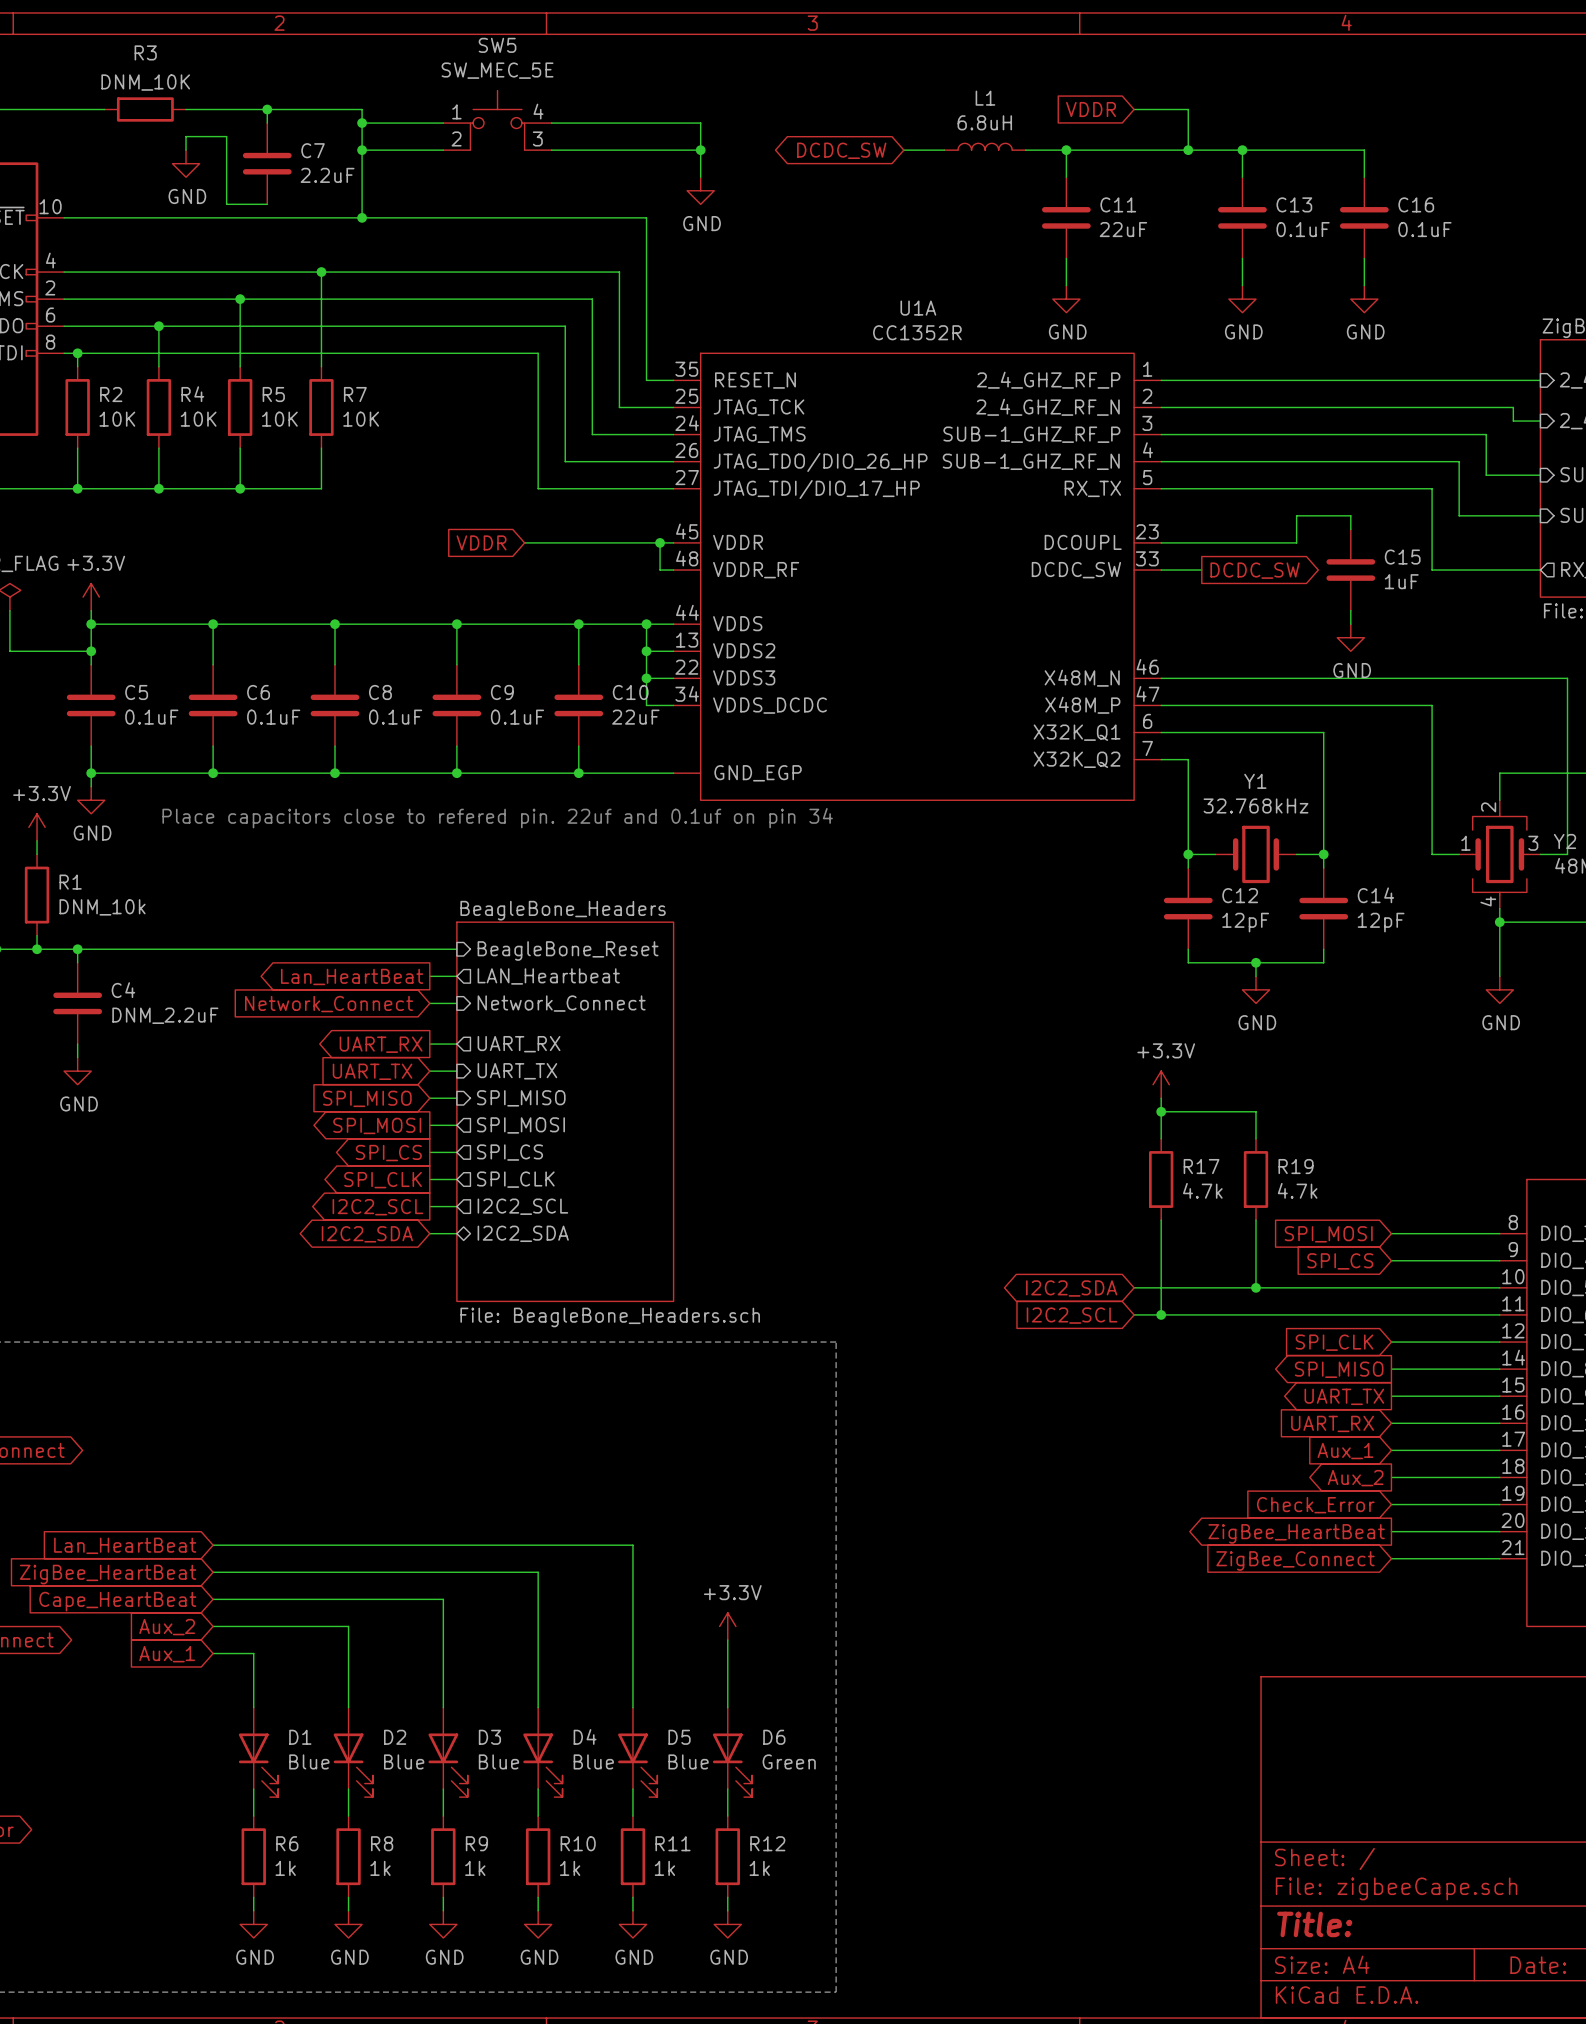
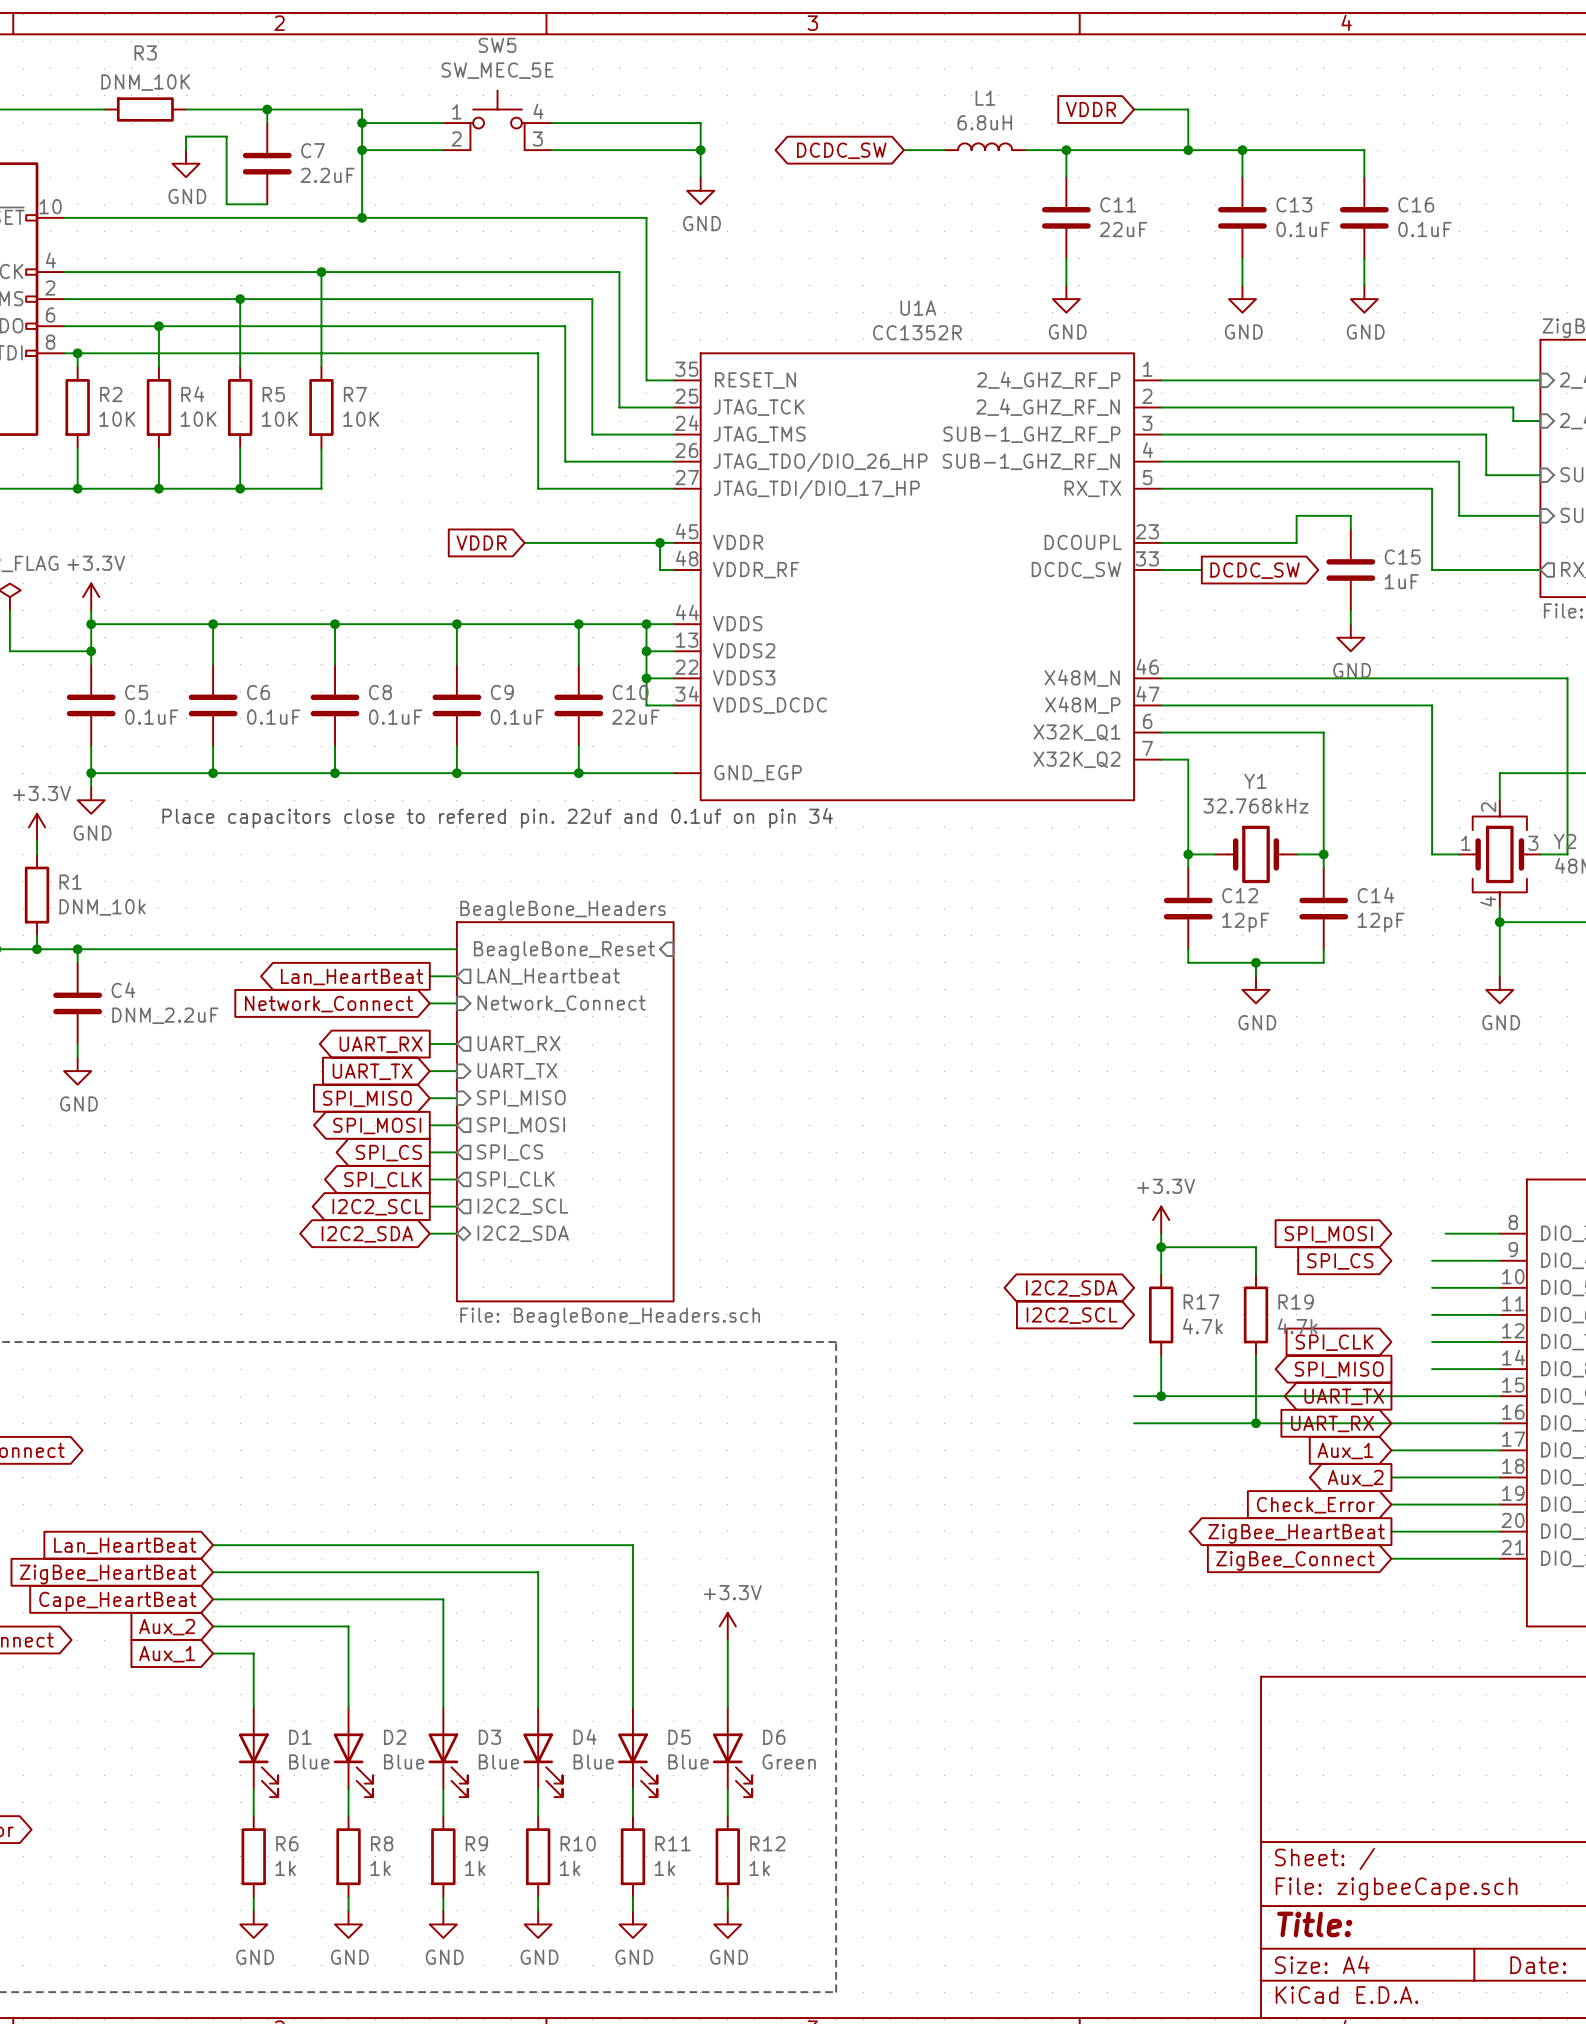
sheet pin rotation: 0° (568, 951) -> 180° (564, 951)
power symbol position: +3.3V (1161, 1084) -> +3.3V (1161, 1220)
wire: (1161, 1098) (1161, 1138) -> none
wire: (1161, 1111) (1256, 1111) (1256, 1138) -> none
junction: (1161, 1111) -> none
R17 position: (1161, 1179) -> (1161, 1314)
R19 position: (1256, 1179) -> (1256, 1314)
wire: (1256, 1220) (1256, 1247) -> (1161, 1247) (1256, 1247)
wire: (1391, 1233) (1445, 1233) -> none
junction: none -> (1161, 1247)
wire: (1391, 1260) (1432, 1260) -> none
wire: (1161, 1274) (1161, 1314) -> (1161, 1355) (1161, 1396)
wire: (1134, 1287) (1432, 1287) -> none
junction: (1256, 1287) -> none
wire: (1134, 1314) (1432, 1314) -> none
junction: (1161, 1314) -> none
wire: (1391, 1342) (1432, 1342) -> none
wire: none -> (1256, 1355) (1256, 1423)
wire: (1391, 1369) (1432, 1369) -> none
wire: none -> (1134, 1396) (1391, 1396)
junction: none -> (1161, 1396)
wire: none -> (1134, 1423) (1391, 1423)
junction: none -> (1256, 1423)

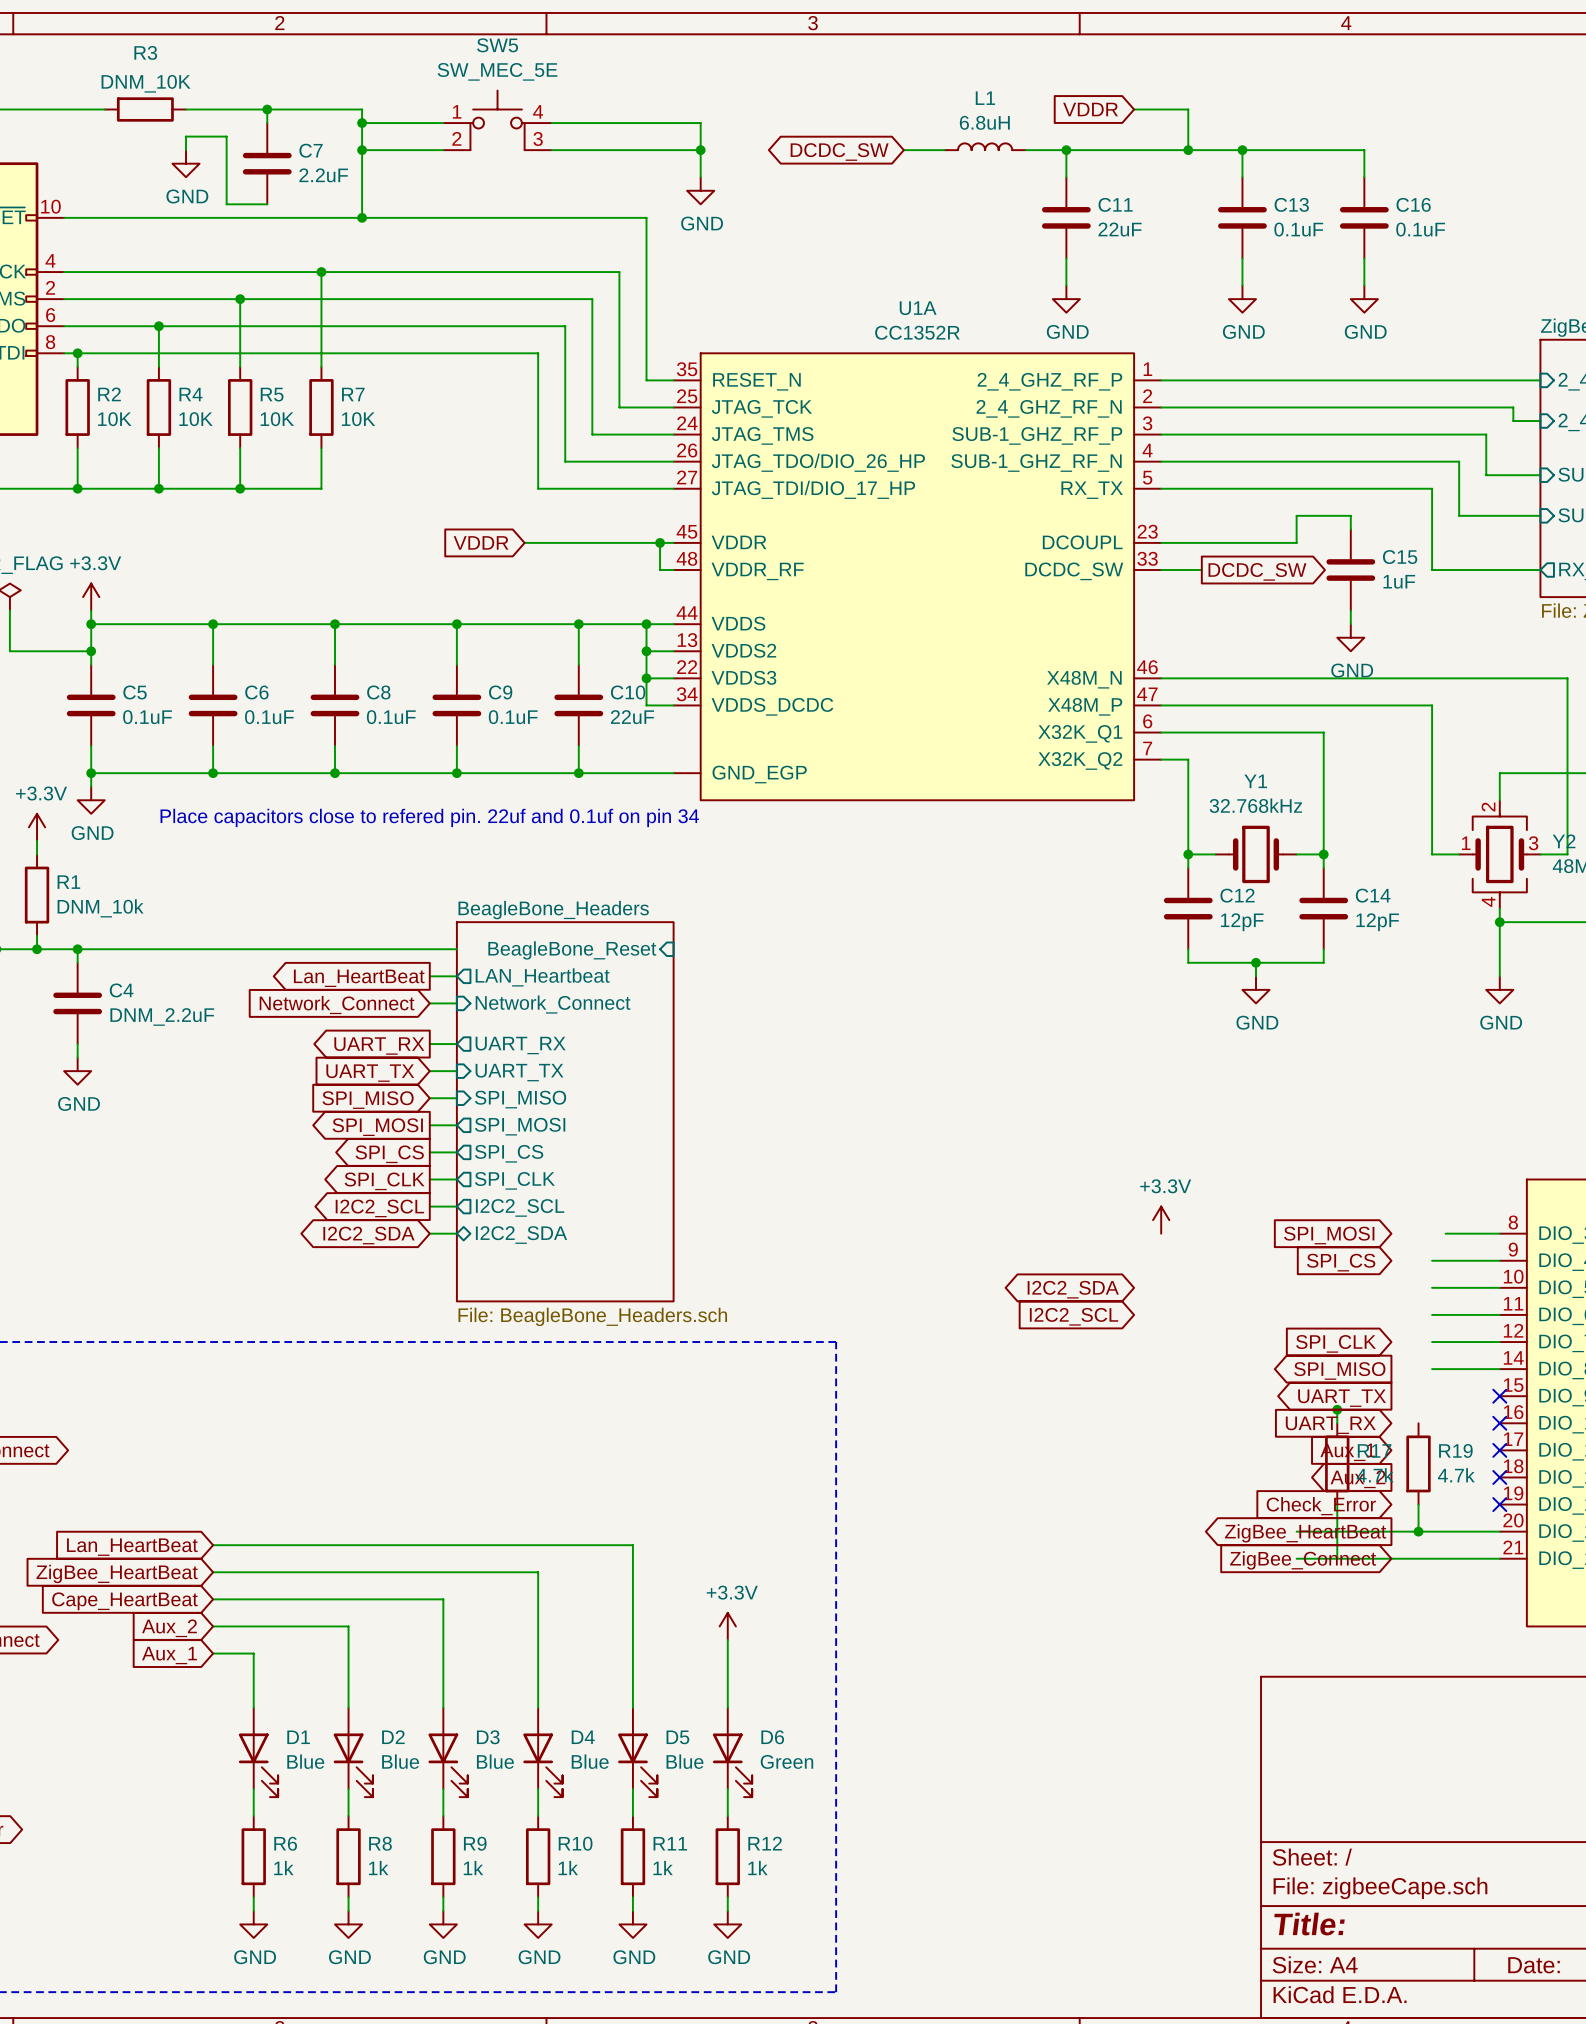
wire: (1161, 1233) (1161, 1274) -> none
wire: (1161, 1247) (1256, 1247) (1256, 1274) -> none
junction: (1161, 1247) -> none
R17 position: (1161, 1314) -> (1337, 1463)
R19 position: (1256, 1314) -> (1418, 1463)
wire: (1161, 1355) (1161, 1396) -> none
wire: (1256, 1355) (1256, 1423) -> none
wire: (1134, 1396) (1499, 1396) -> none
junction: (1161, 1396) -> none
no-connect mark: none -> (1499, 1396)
wire: none -> (1337, 1409) (1337, 1423)
junction: none -> (1337, 1409)
wire: (1134, 1423) (1499, 1423) -> none
junction: (1256, 1423) -> none
no-connect mark: none -> (1499, 1423)
wire: (1391, 1450) (1499, 1450) -> none
no-connect mark: none -> (1499, 1450)
wire: (1391, 1477) (1499, 1477) -> none
no-connect mark: none -> (1499, 1477)
wire: none -> (1337, 1504) (1337, 1558)
wire: (1391, 1504) (1499, 1504) -> none
wire: none -> (1418, 1504) (1418, 1531)
no-connect mark: none -> (1499, 1504)
wire: none -> (1296, 1531) (1391, 1531)
junction: none -> (1418, 1531)
wire: none -> (1296, 1558) (1391, 1558)

